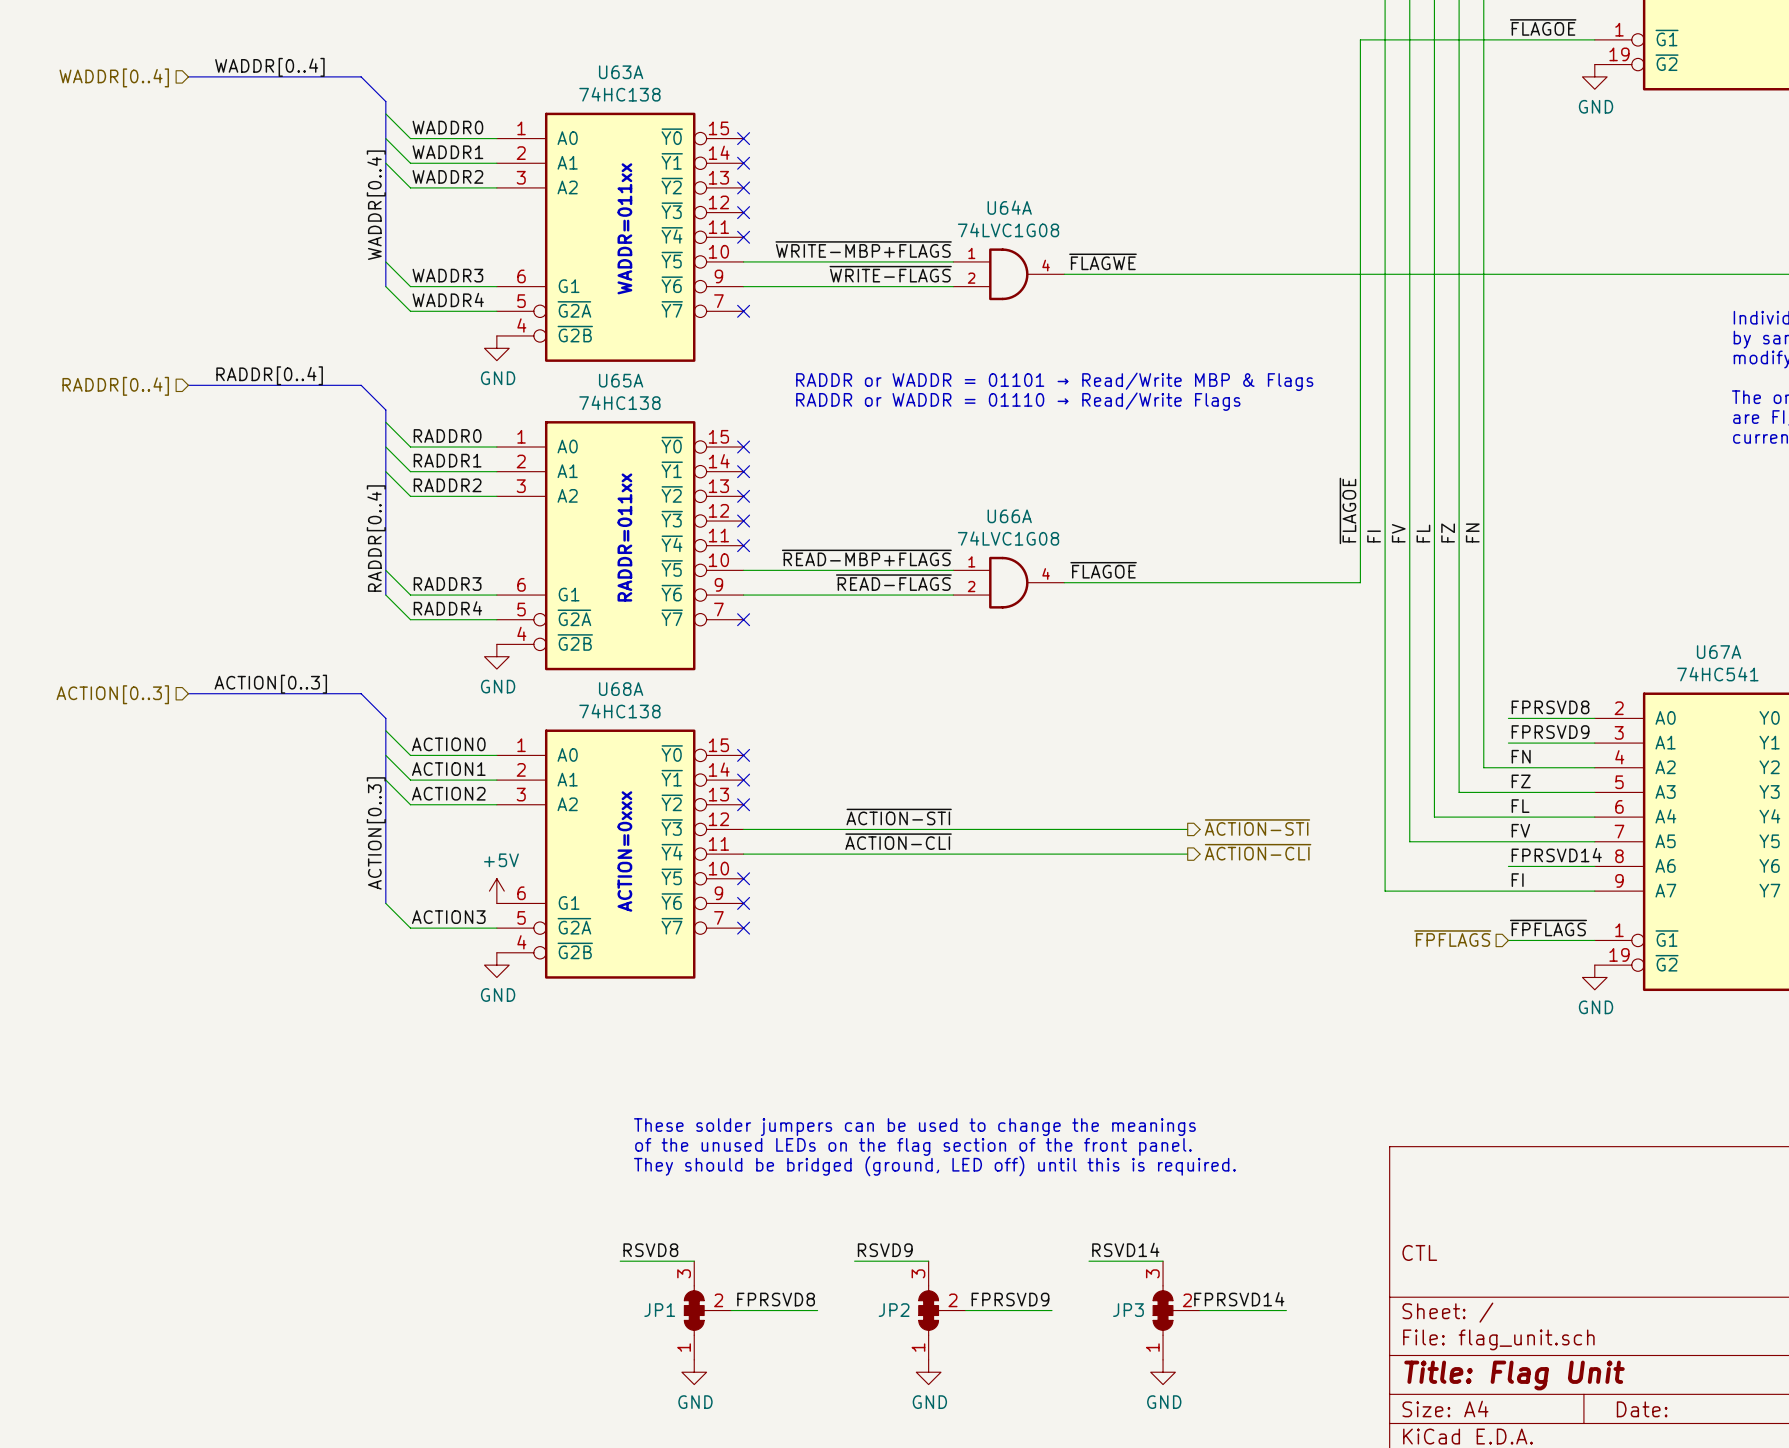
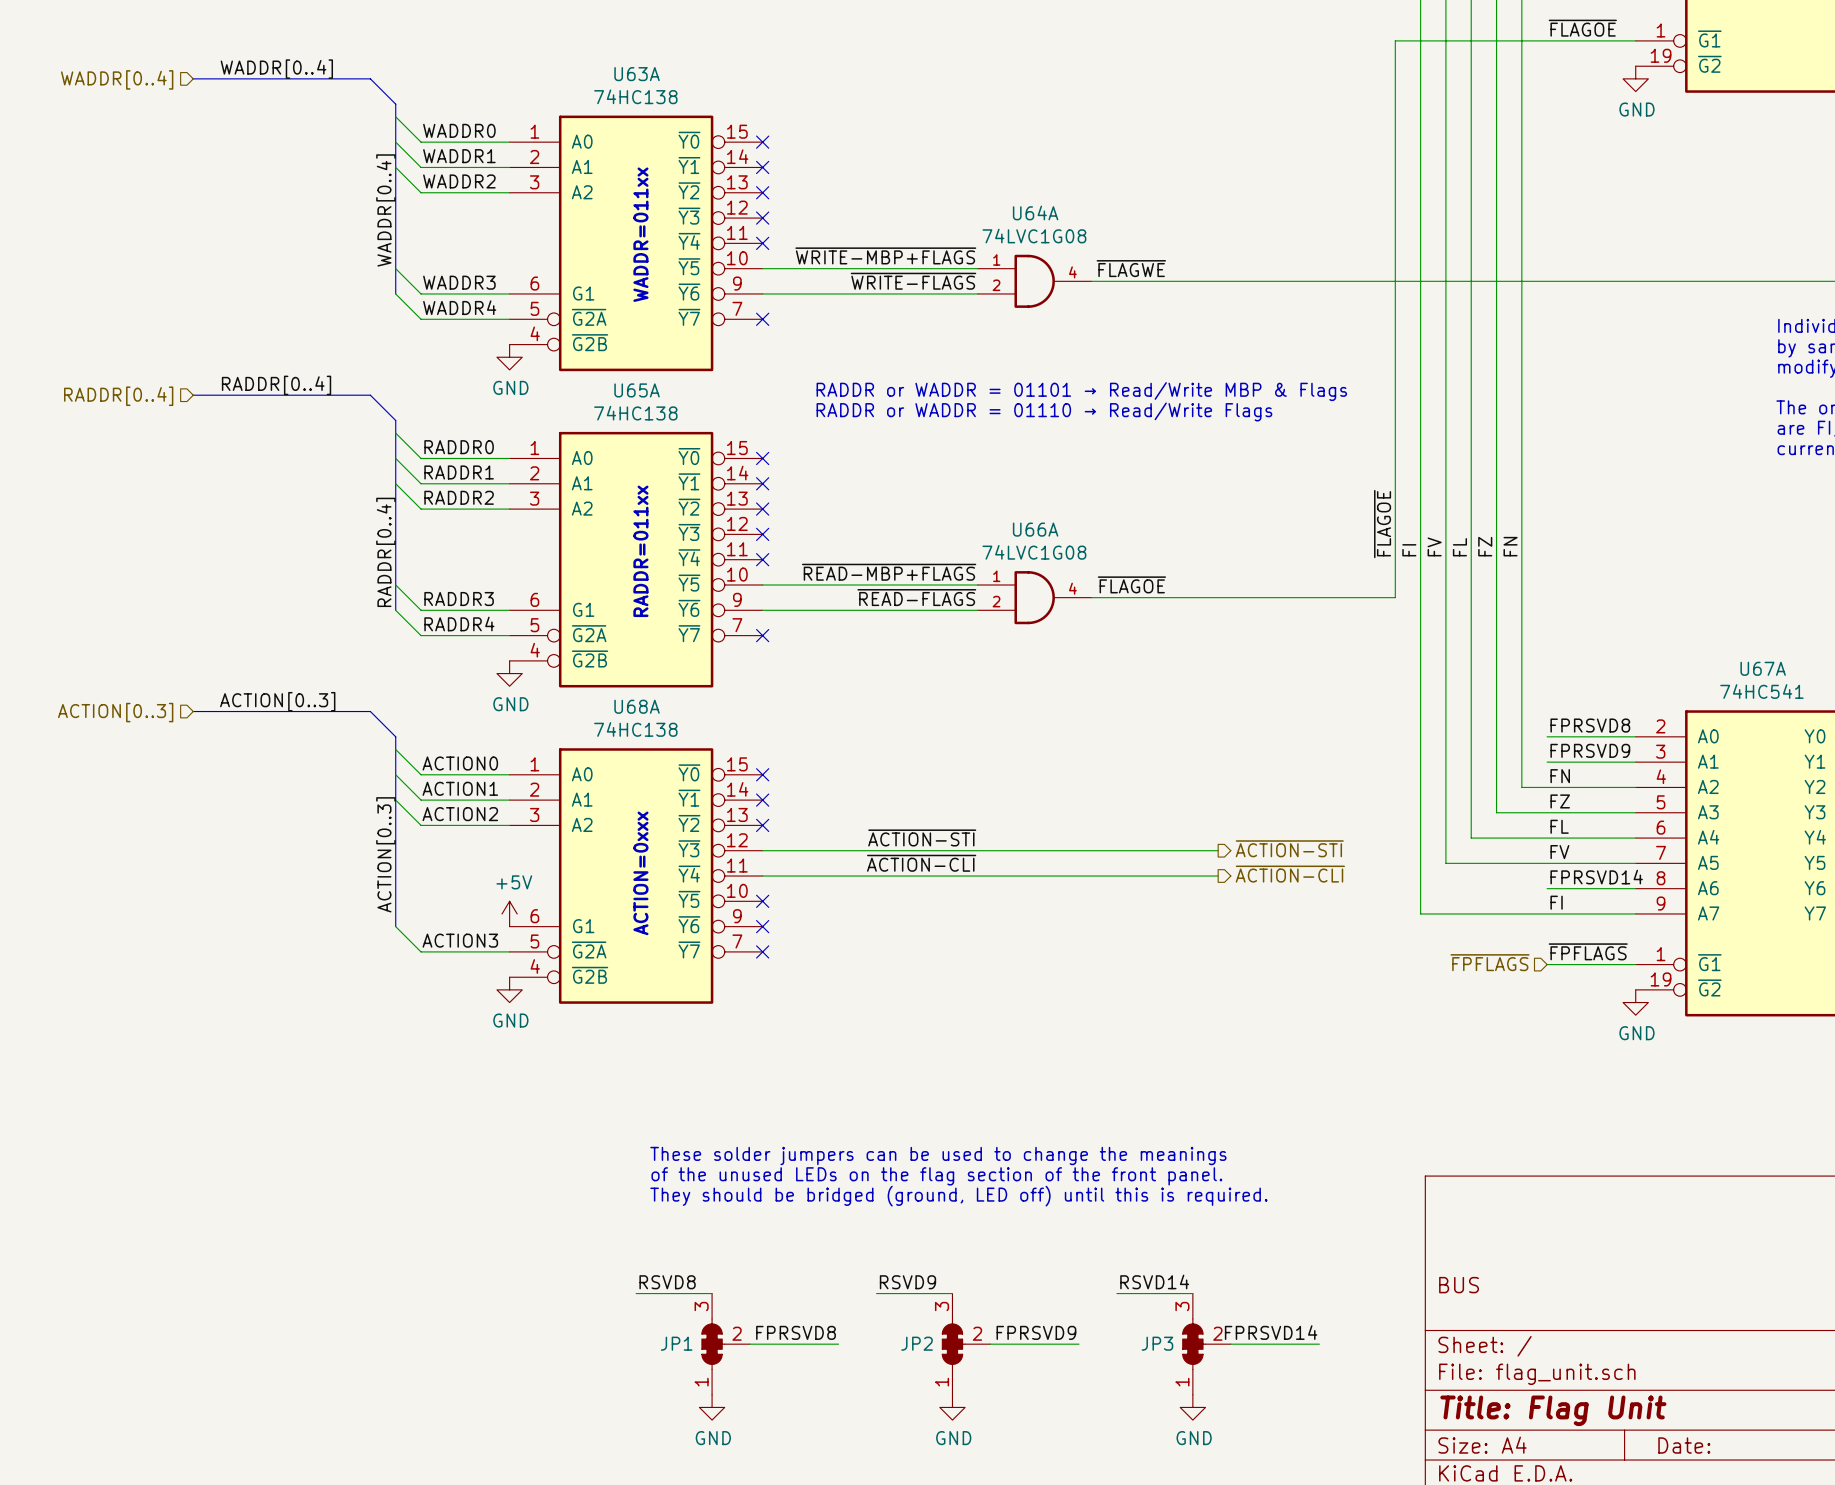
title block: CTL (1419, 1252) -> BUS (1459, 1285)

